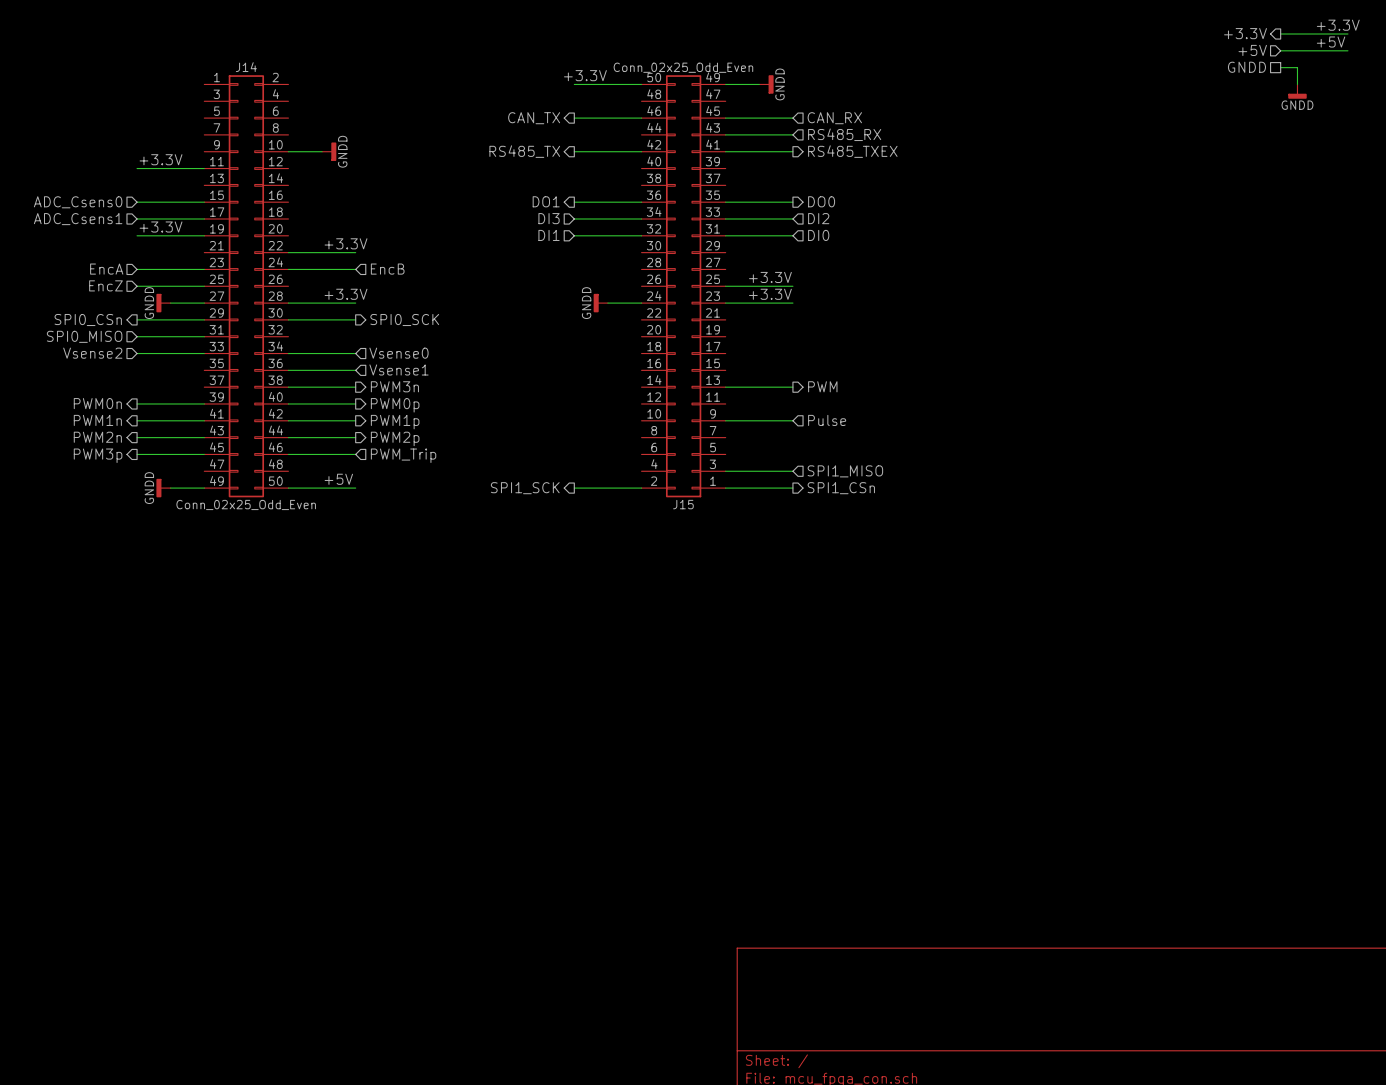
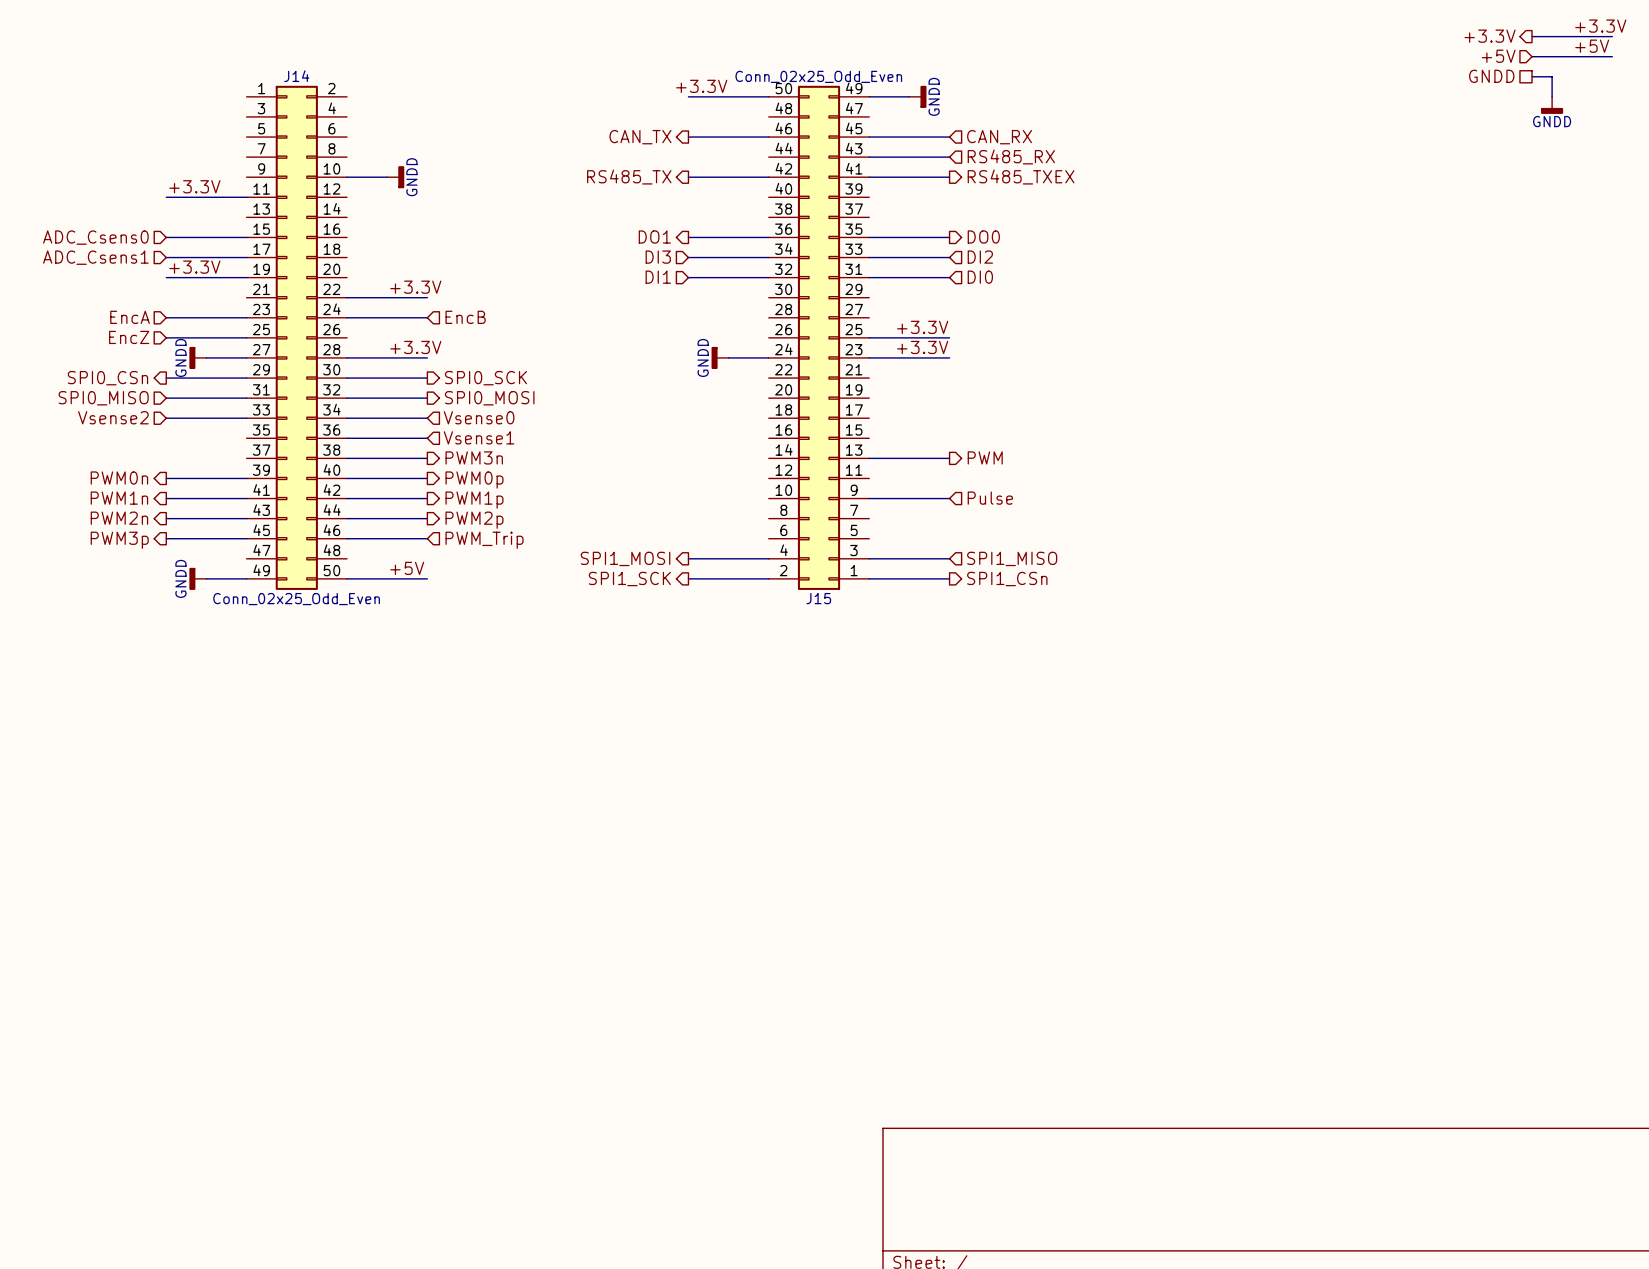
wire: none -> (347, 398) (427, 398)
hierarchical label: none -> SPI0_MOSI (489, 398)
hierarchical label: none -> SPI1_MOSI (625, 558)
wire: none -> (688, 558) (768, 558)

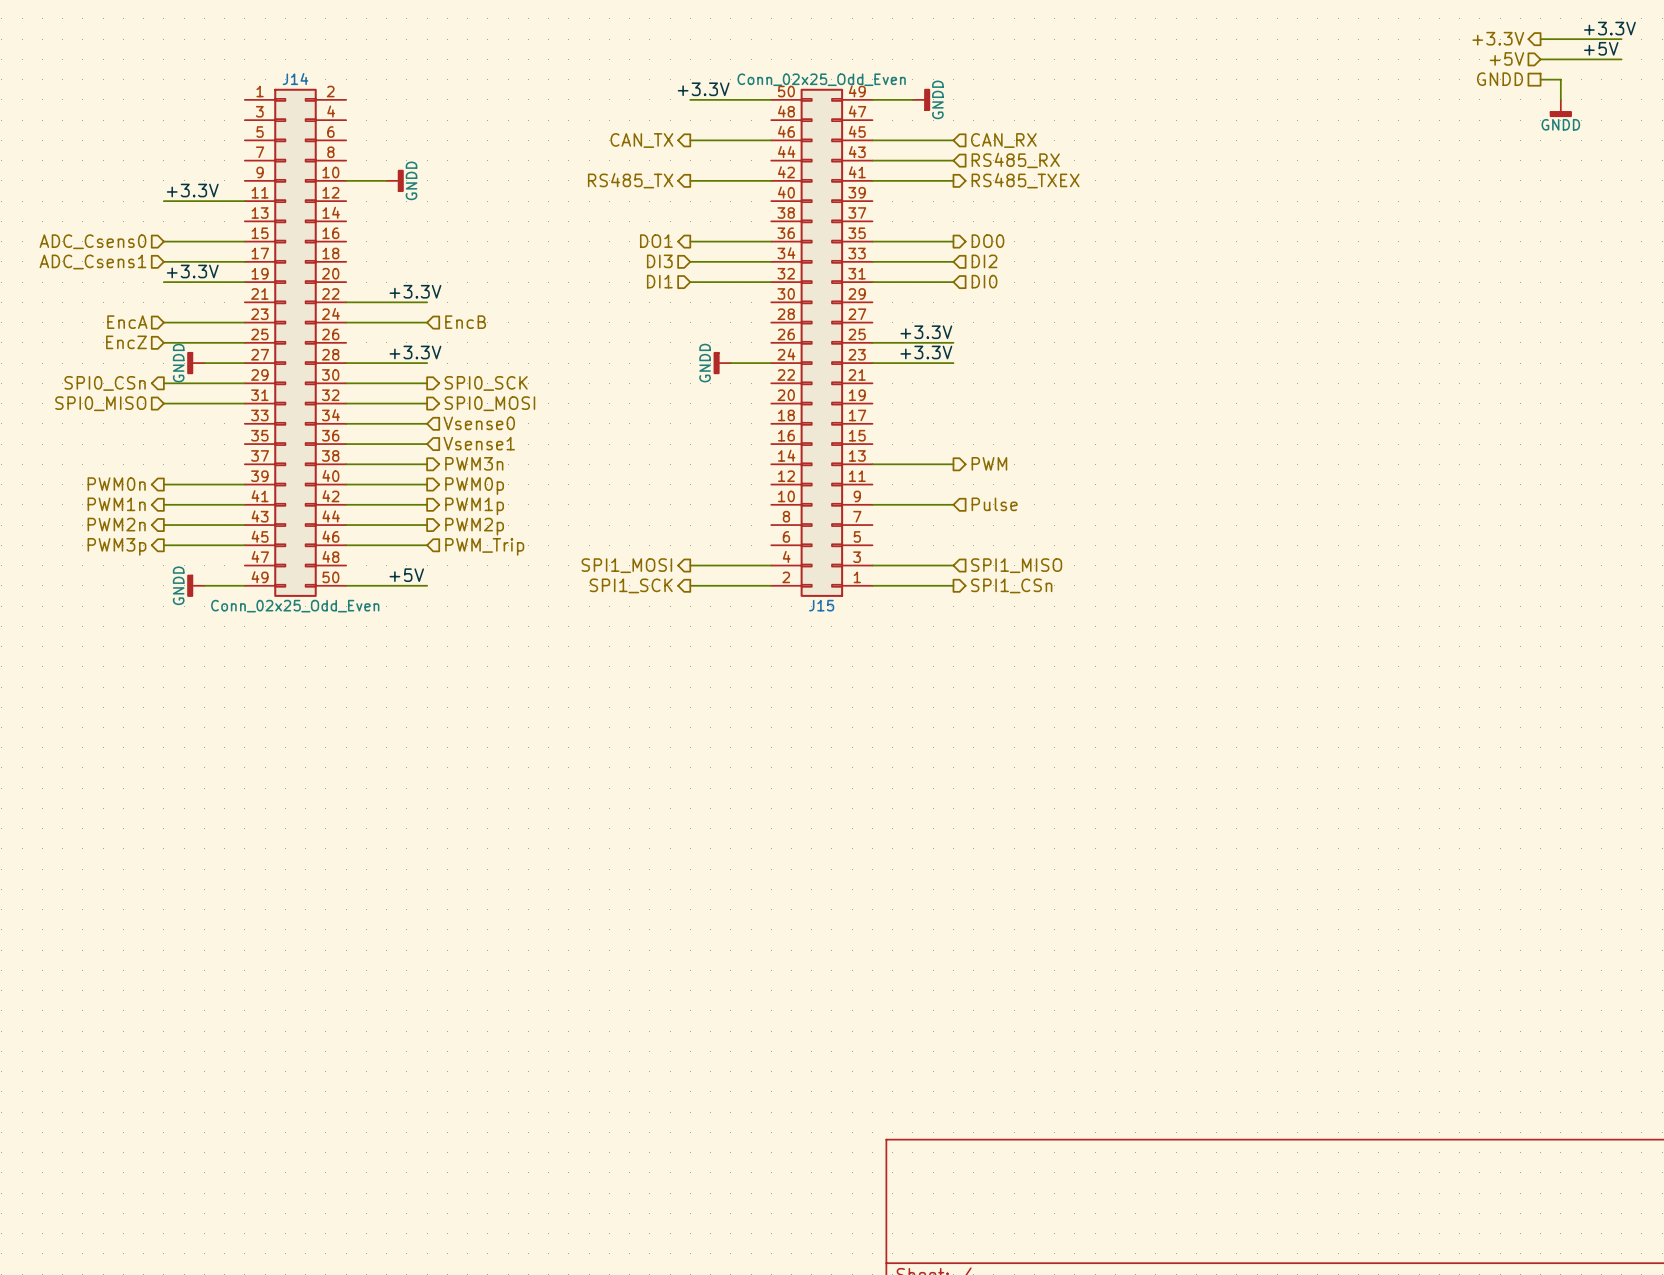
hierarchical label: Vsense2 (113, 417) -> none
wire: (166, 418) (246, 418) -> none

